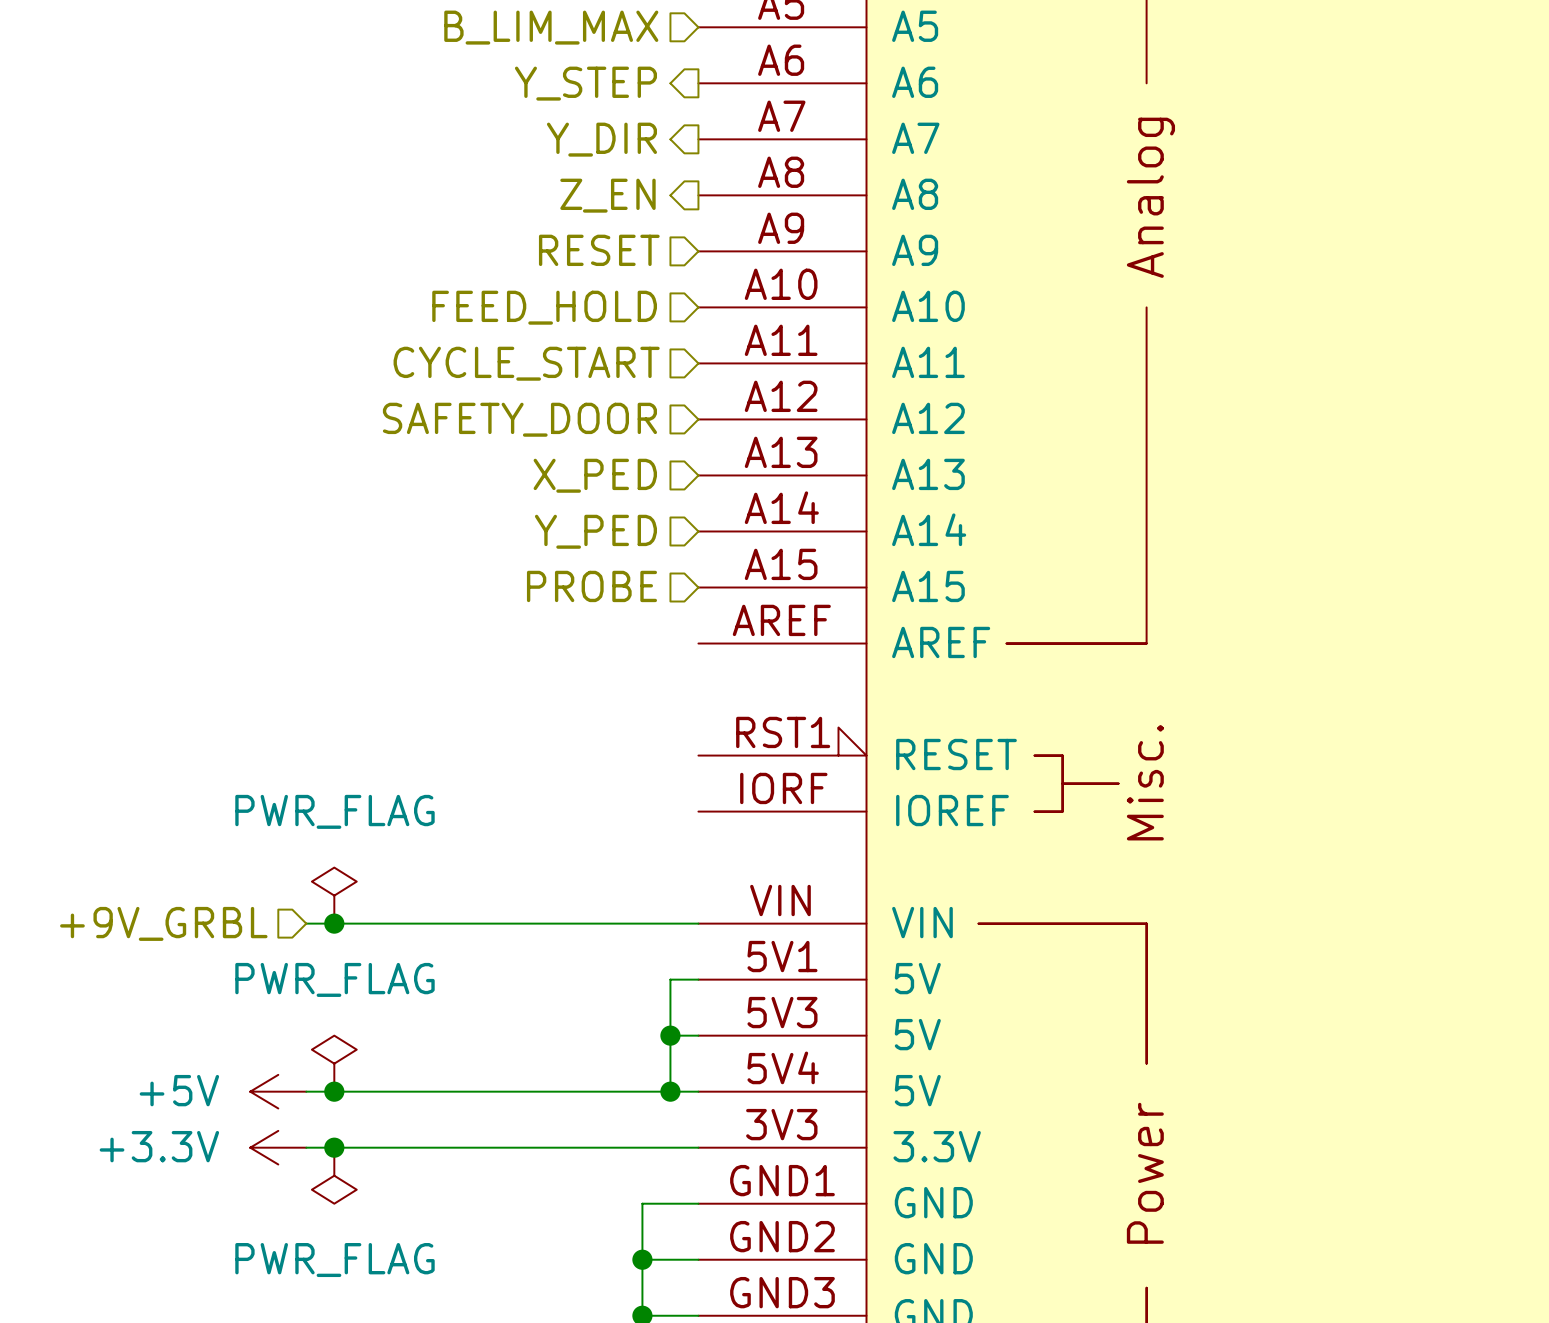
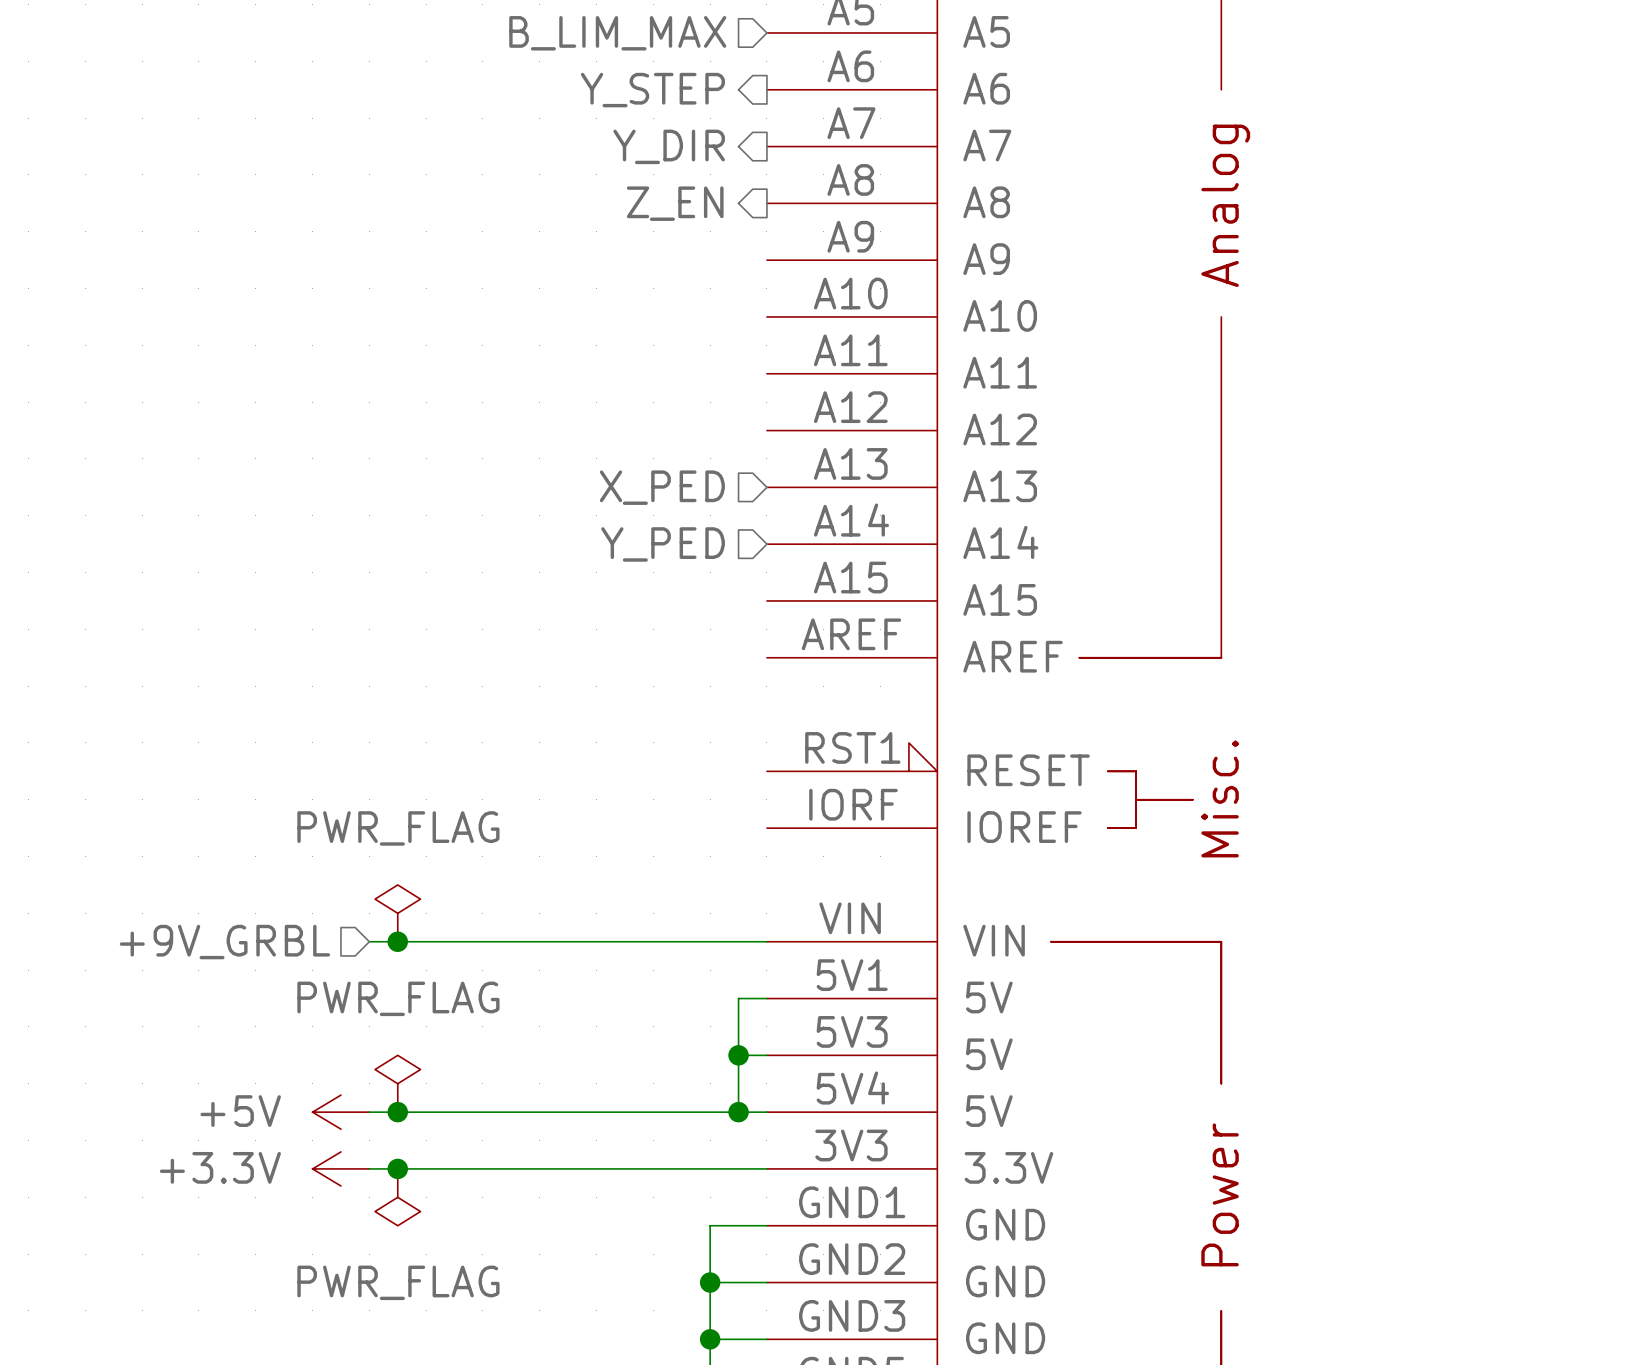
hierarchical label: RESET (599, 250) -> none
hierarchical label: FEED_HOLD (544, 307) -> none
hierarchical label: CYCLE_START (526, 363) -> none
hierarchical label: SAFETY_DOOR (519, 419) -> none
hierarchical label: PROBE (591, 586) -> none

